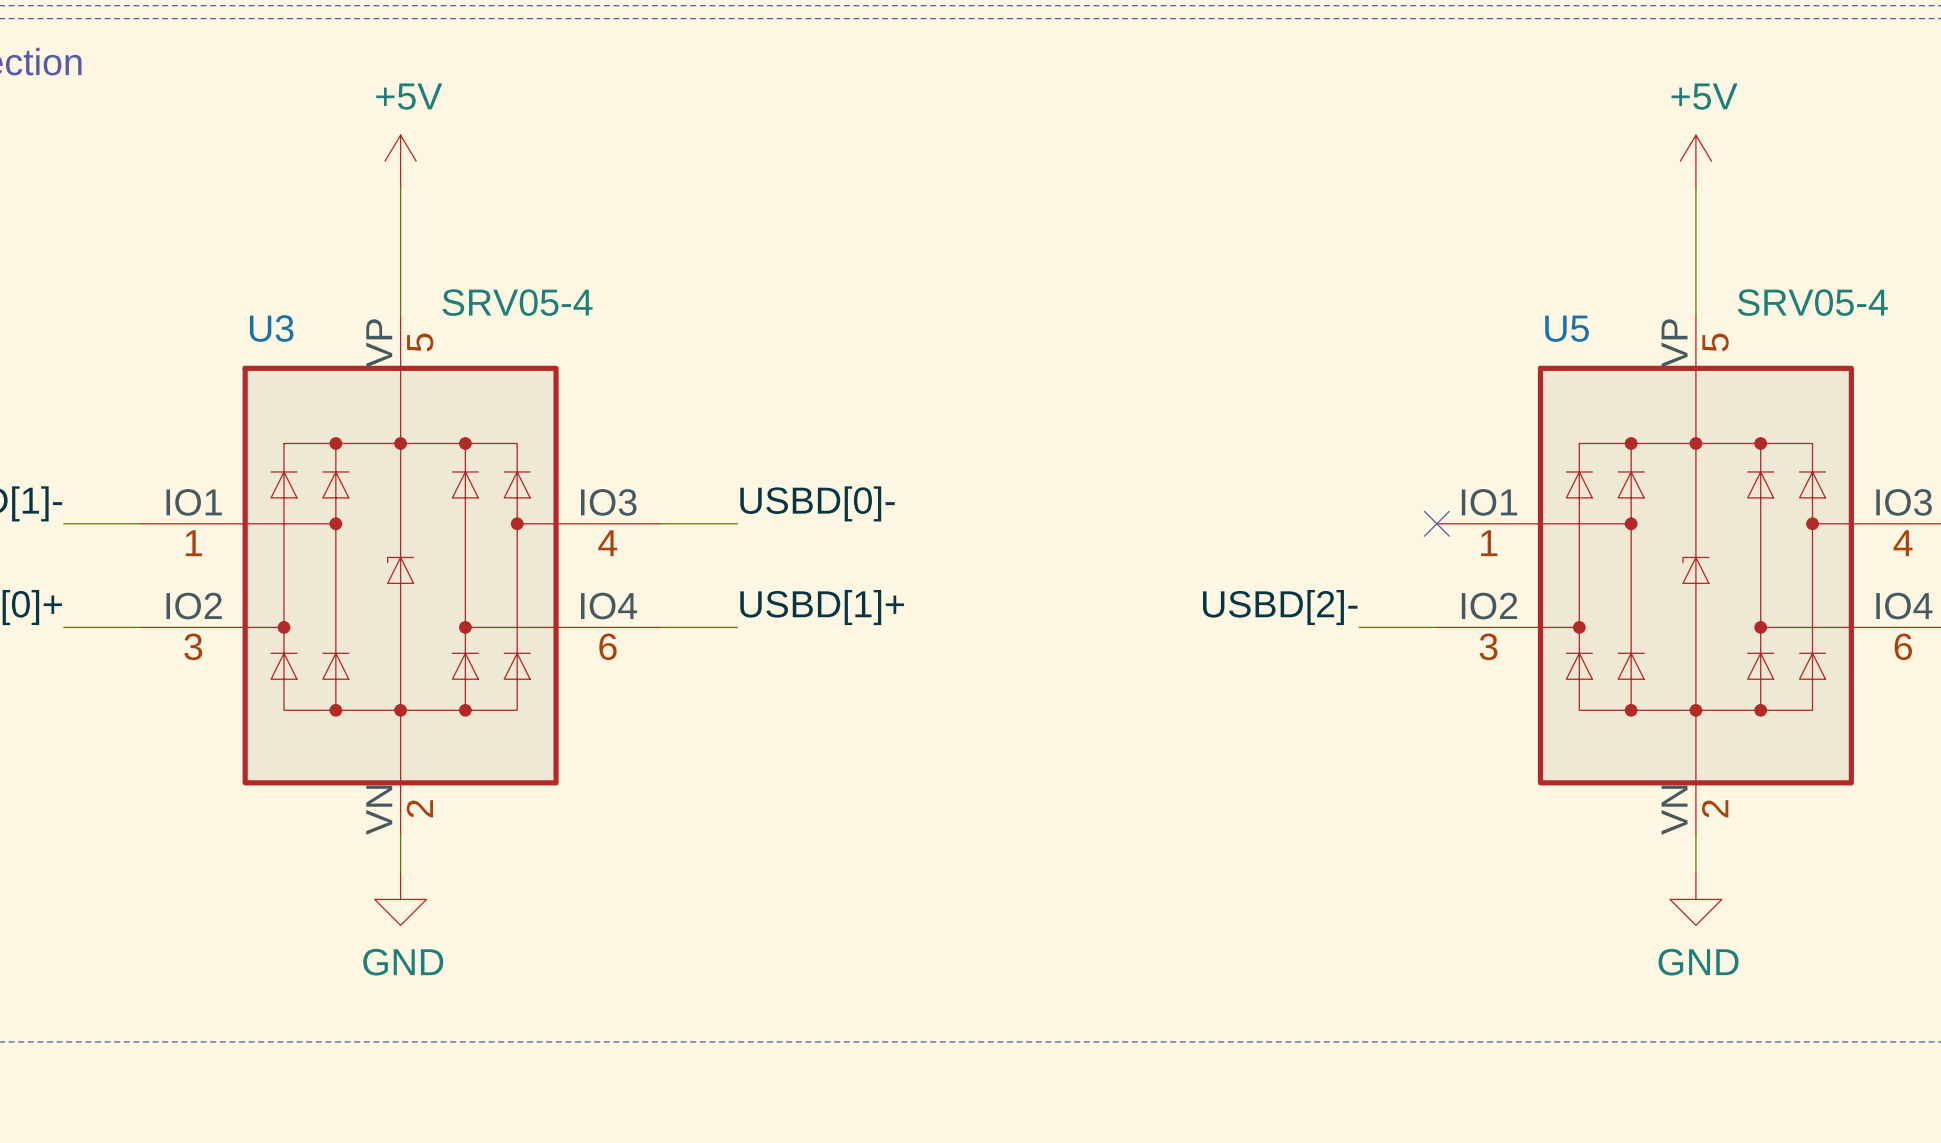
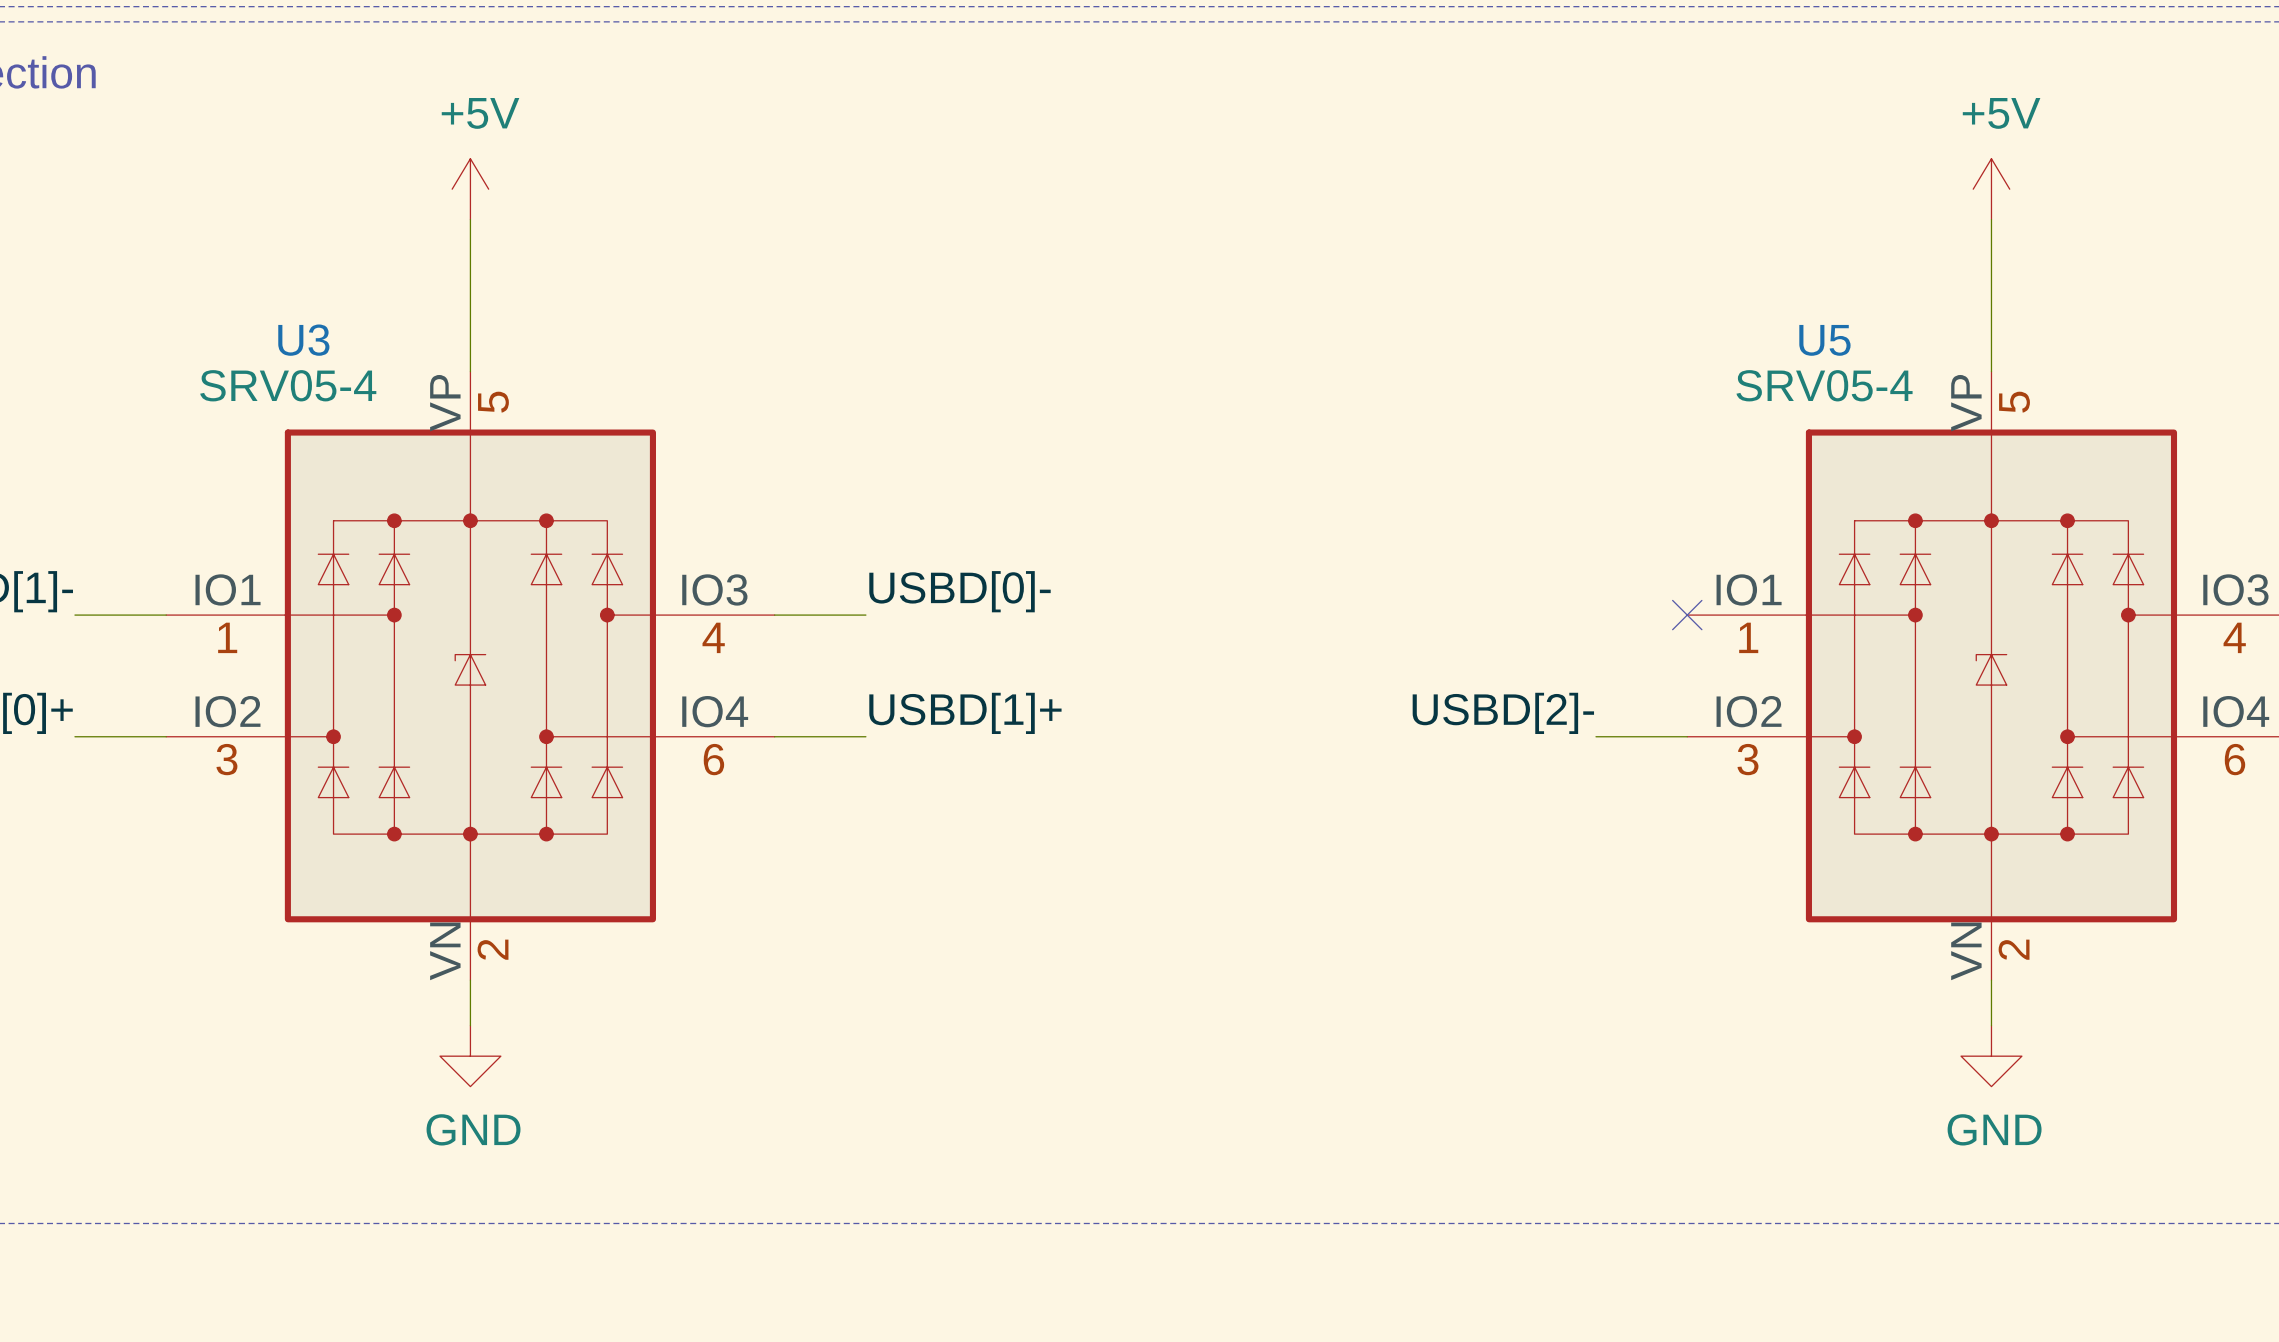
U3 value position: SRV05-4 (517, 302) -> SRV05-4 (288, 385)
U5 value position: SRV05-4 (1812, 302) -> SRV05-4 (1824, 385)
U3 name position: U3 (271, 328) -> U3 (303, 340)
U5 name position: U5 (1567, 328) -> U5 (1824, 340)

